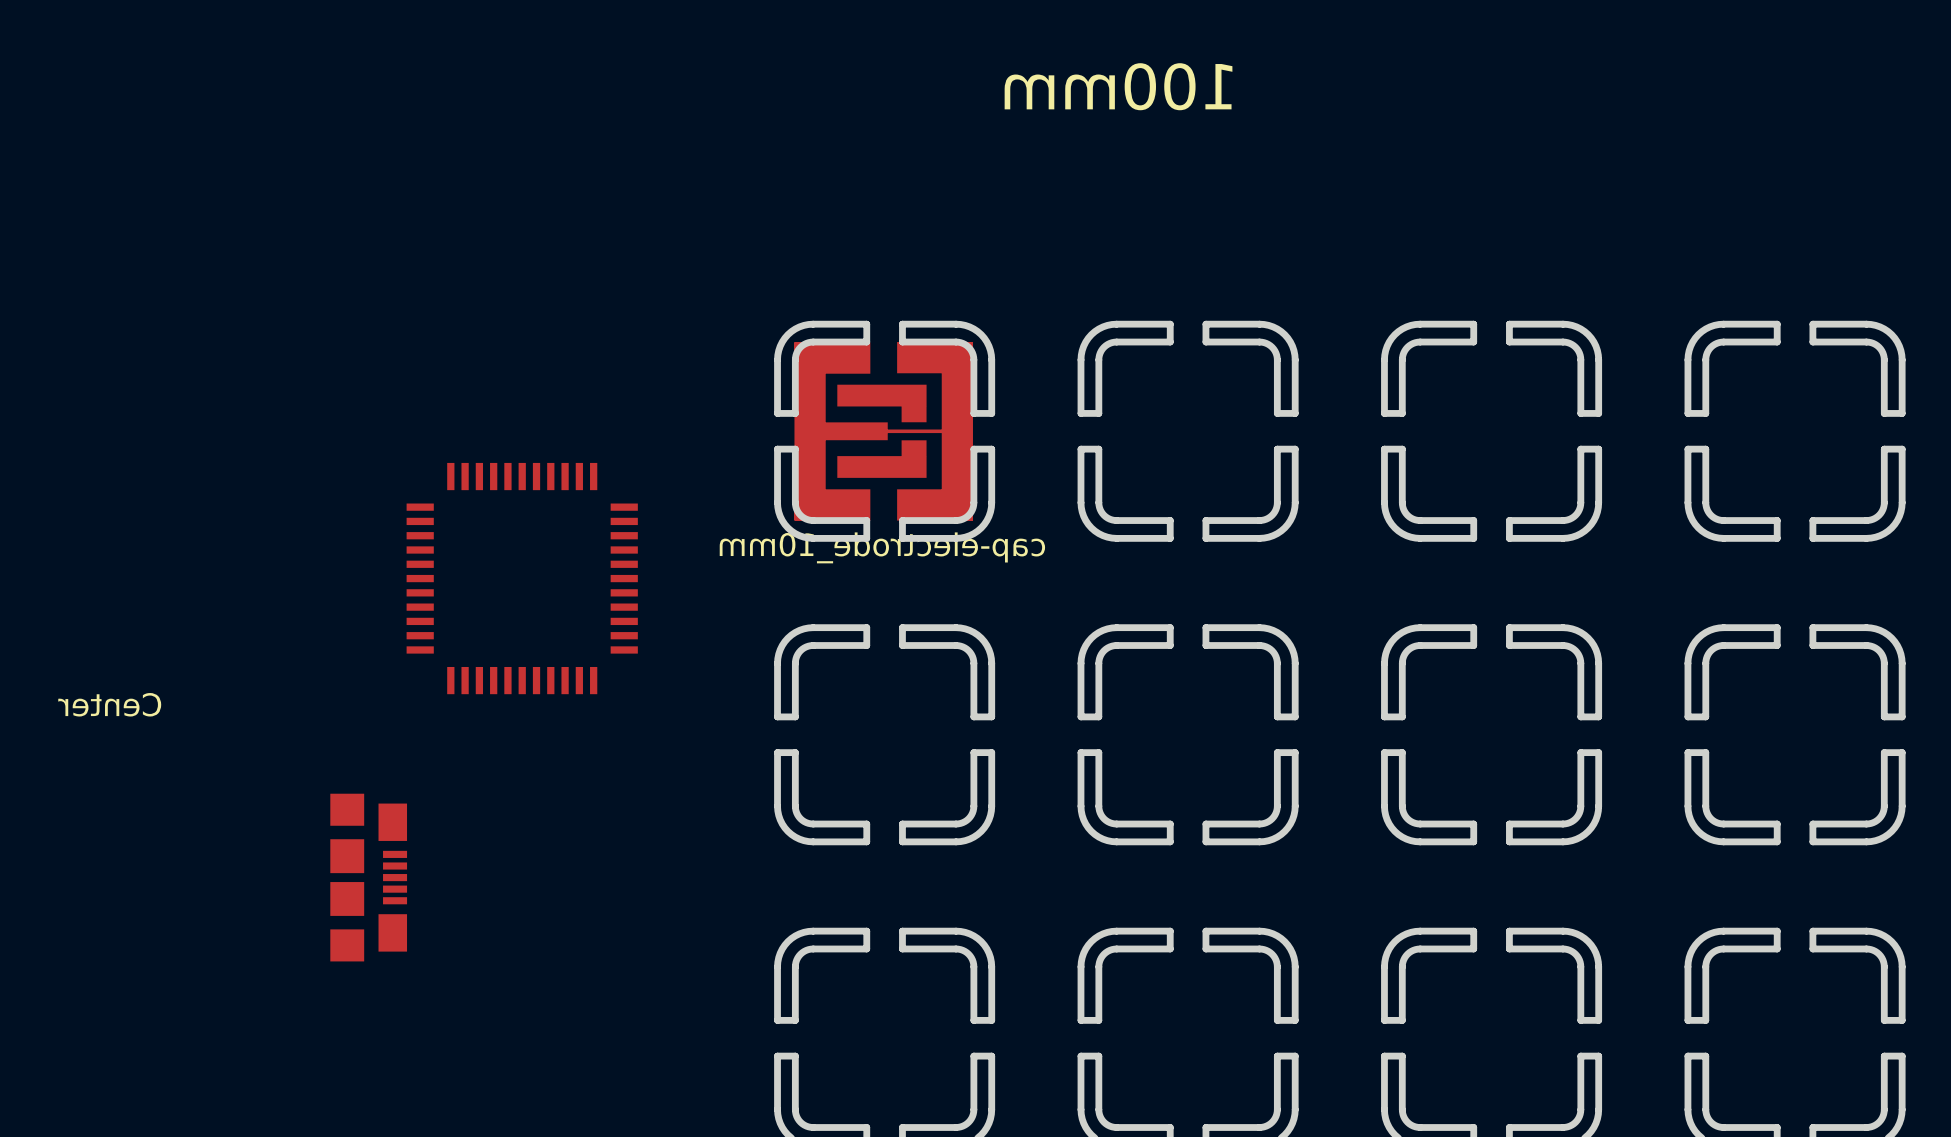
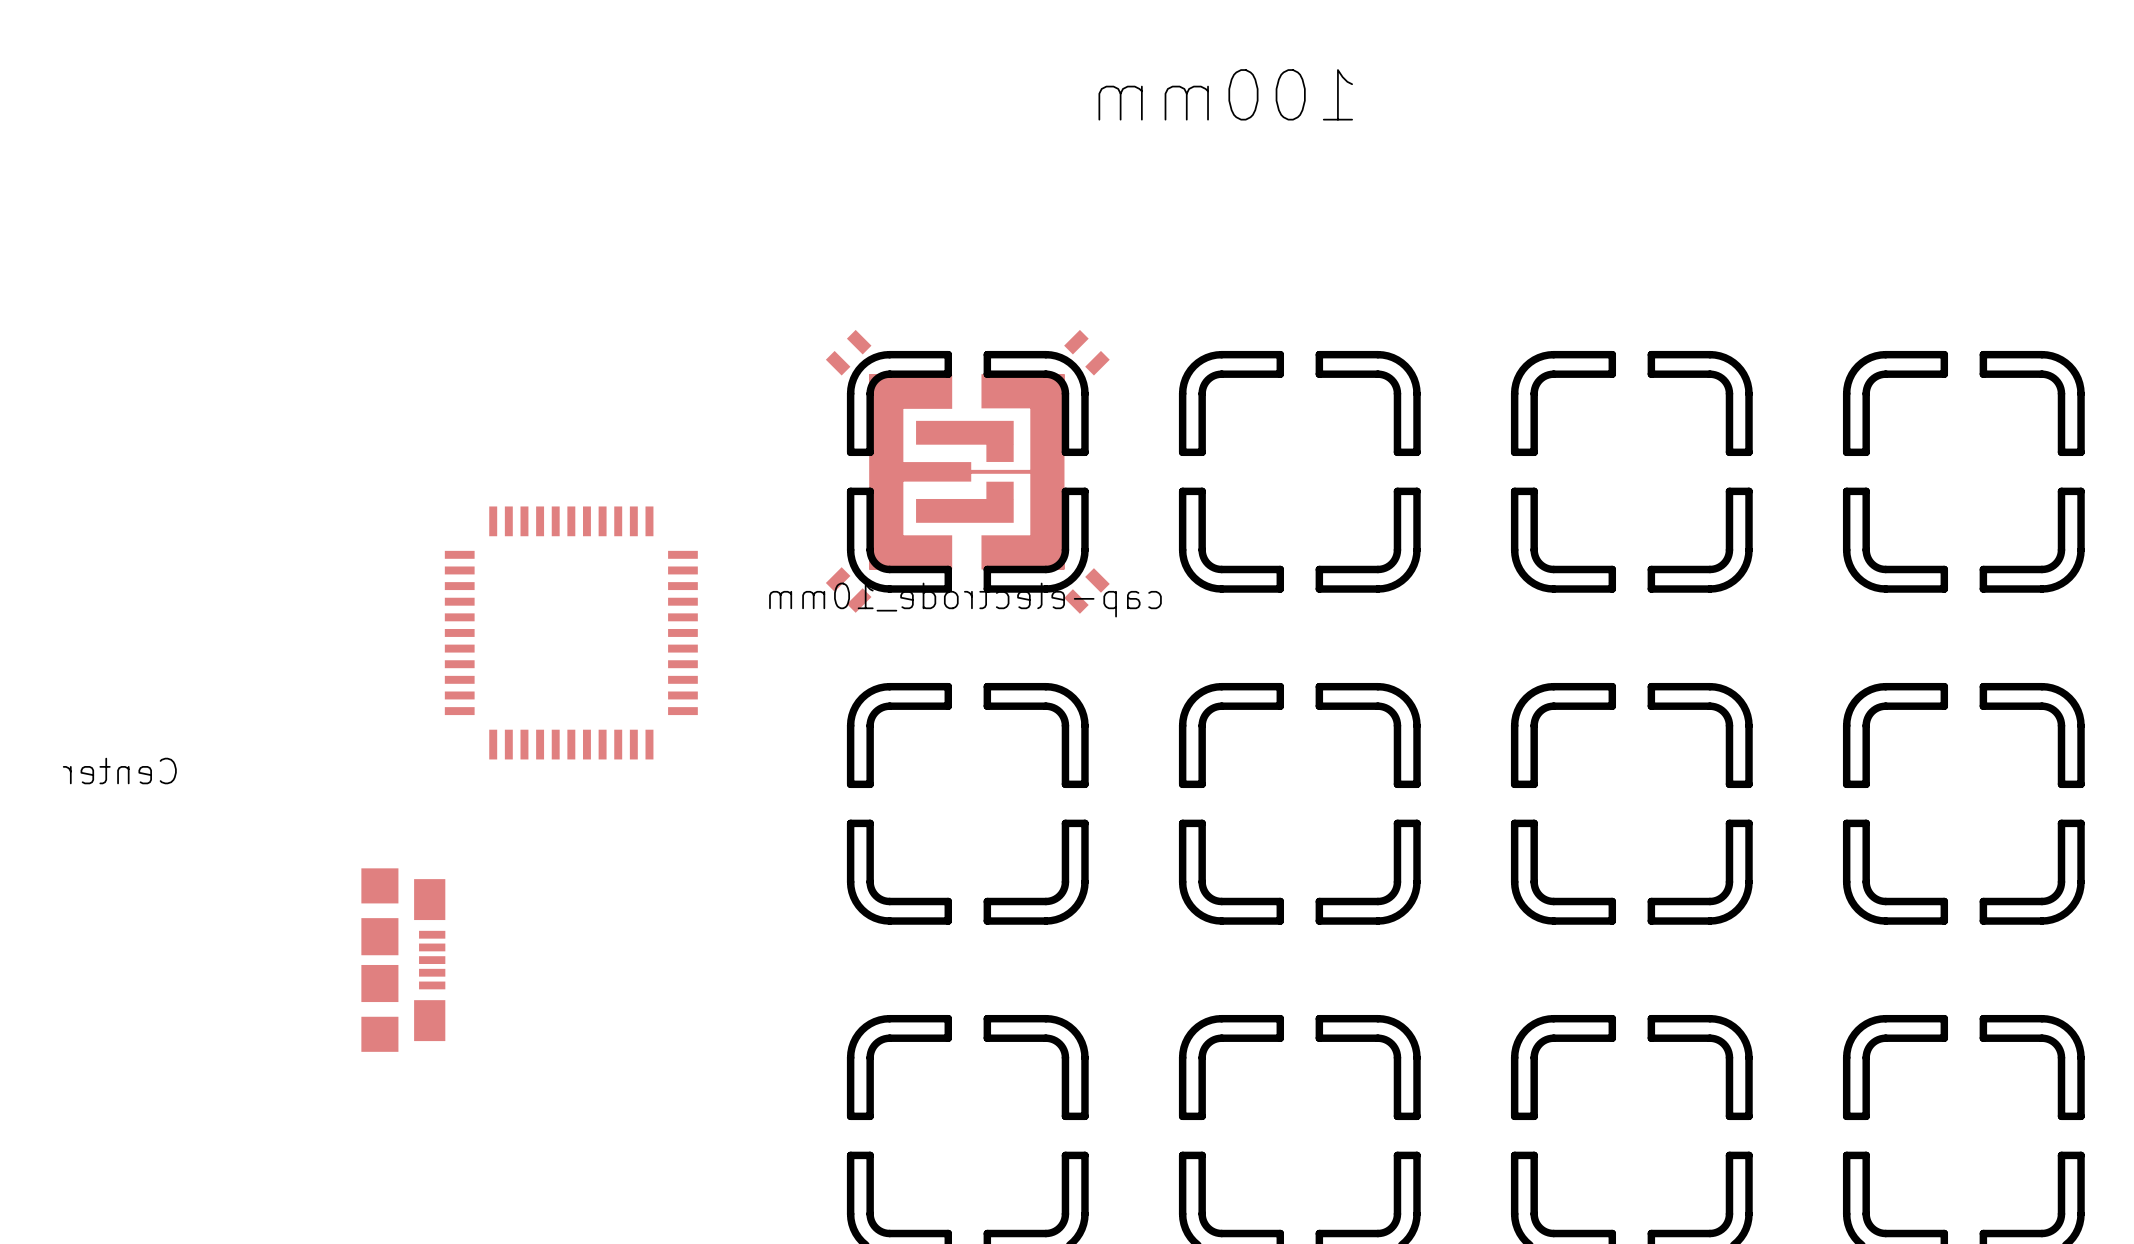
part: none -> (848, 352)
part: none -> (1086, 352)
part: none -> (848, 590)
part: none -> (1086, 590)

